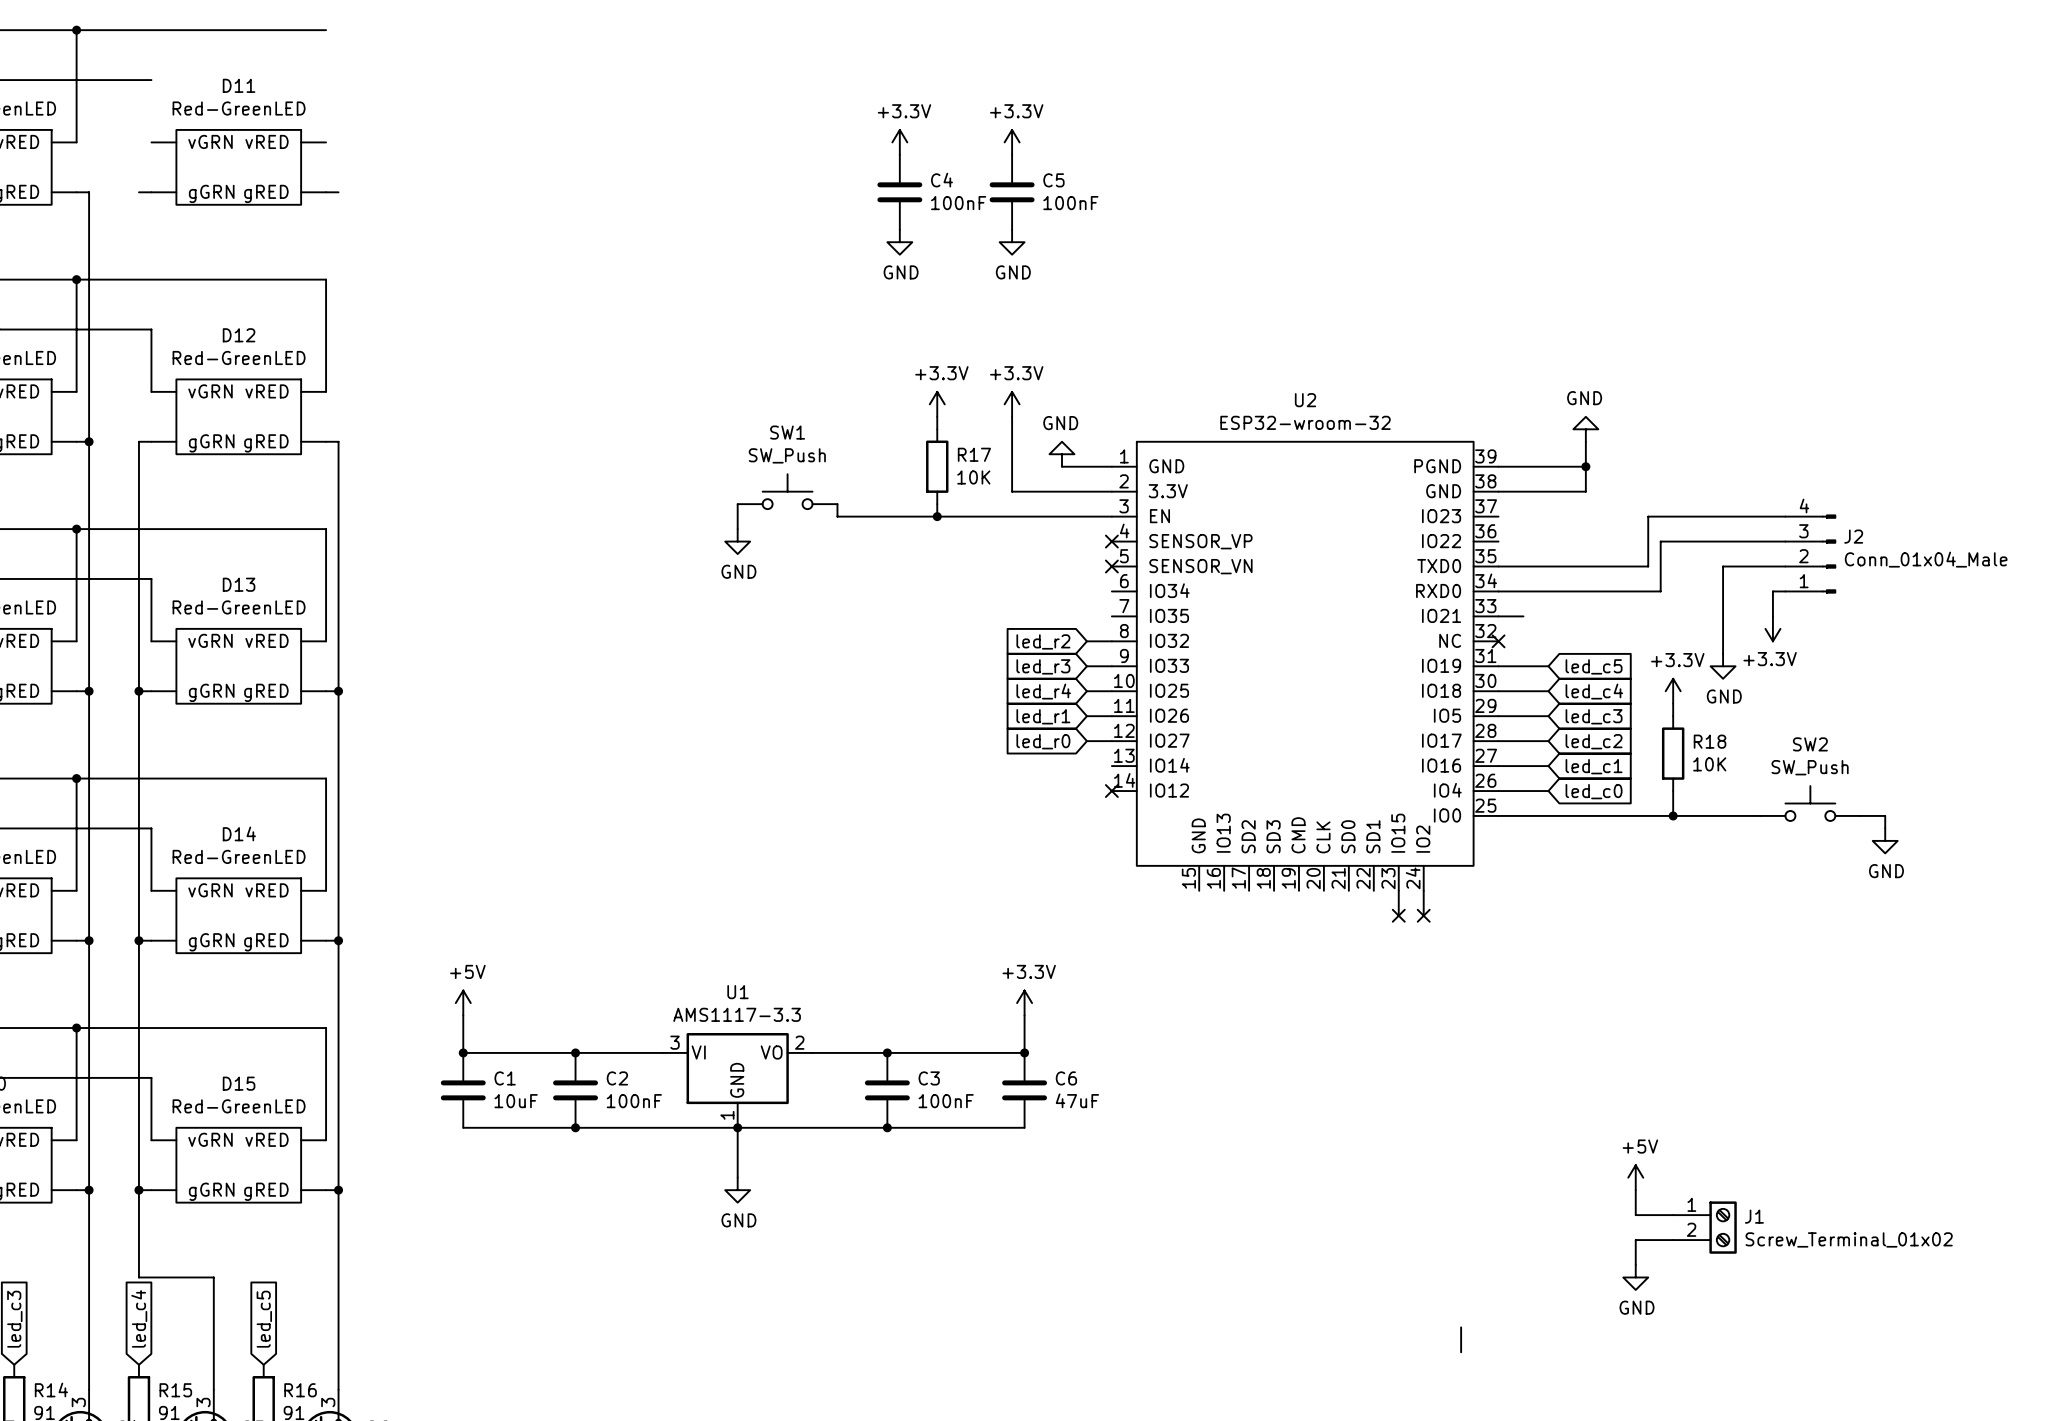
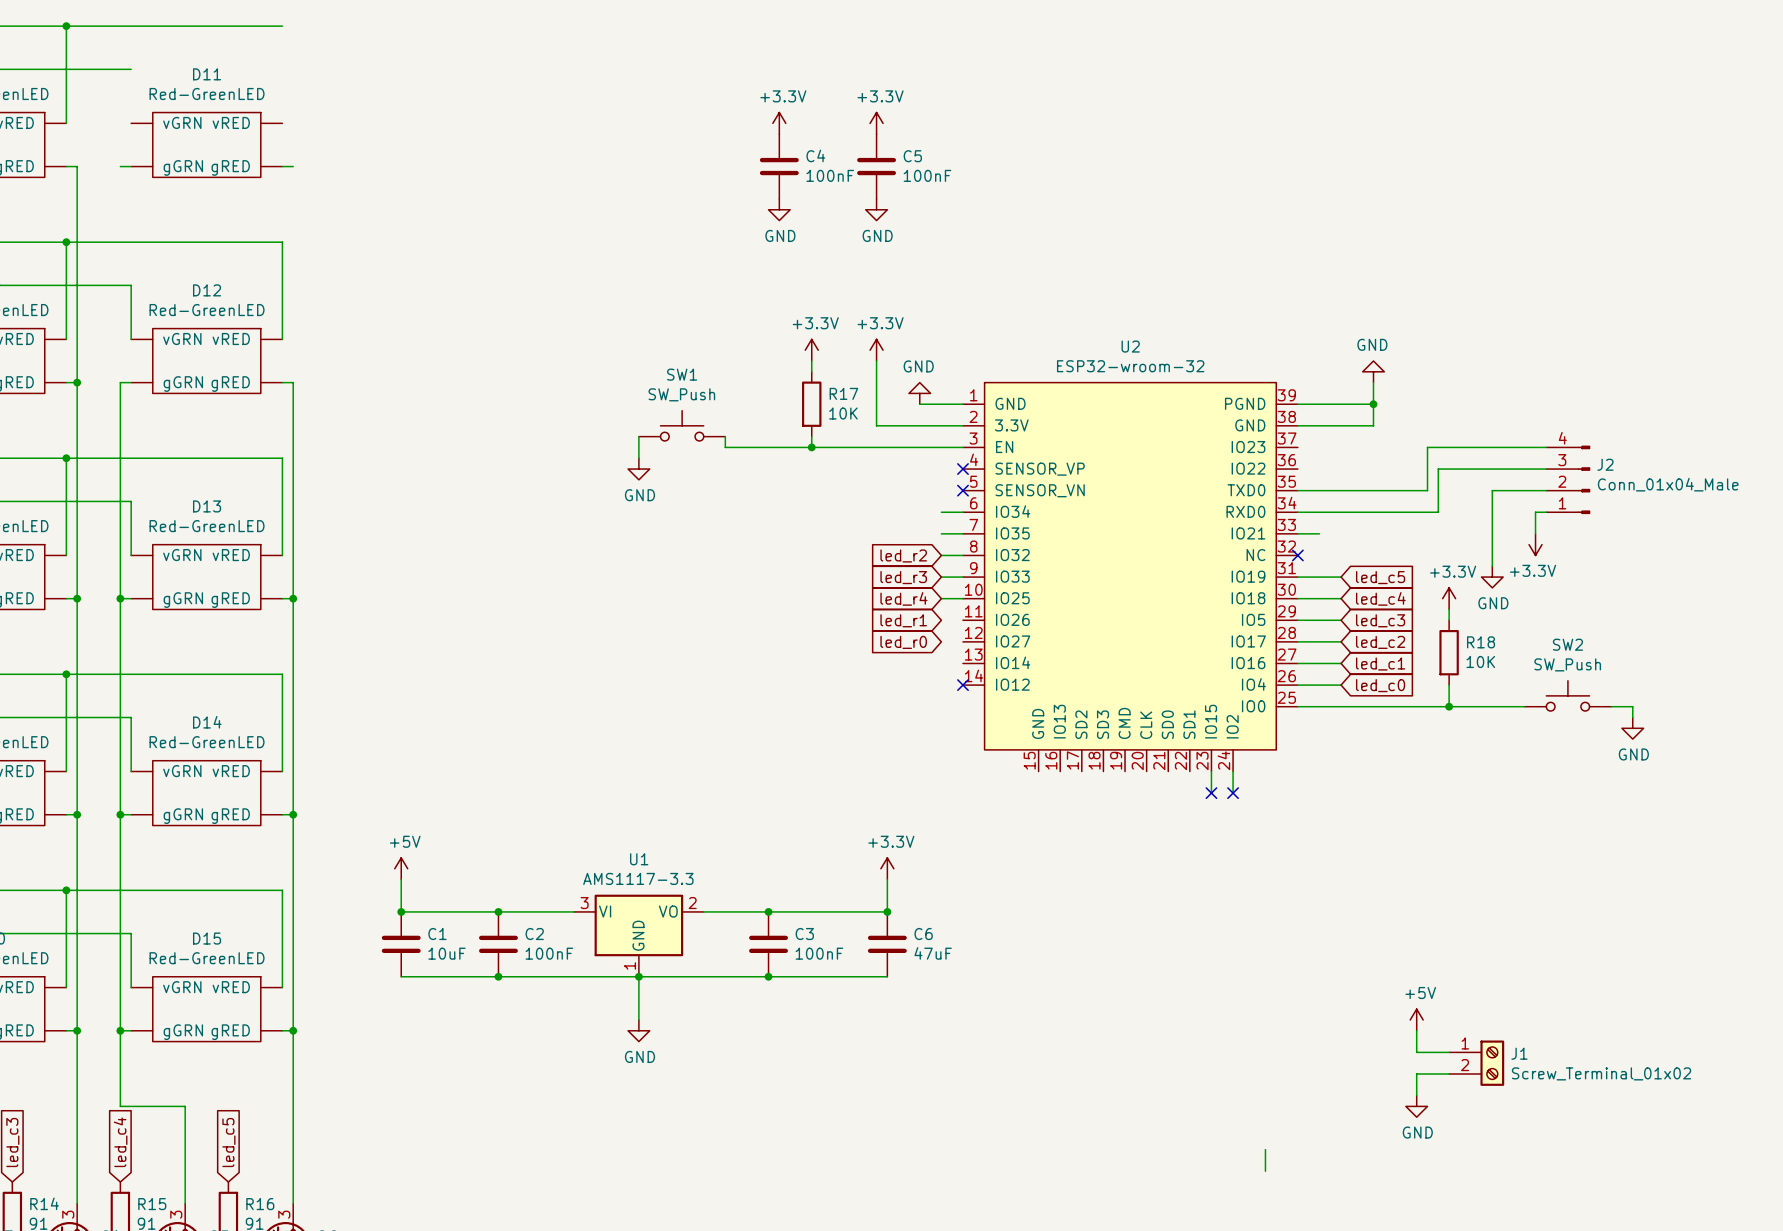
wire: (1086, 716) (1111, 716) -> (941, 512) (962, 512)
wire: (1086, 741) (1111, 741) -> (941, 533) (962, 533)

